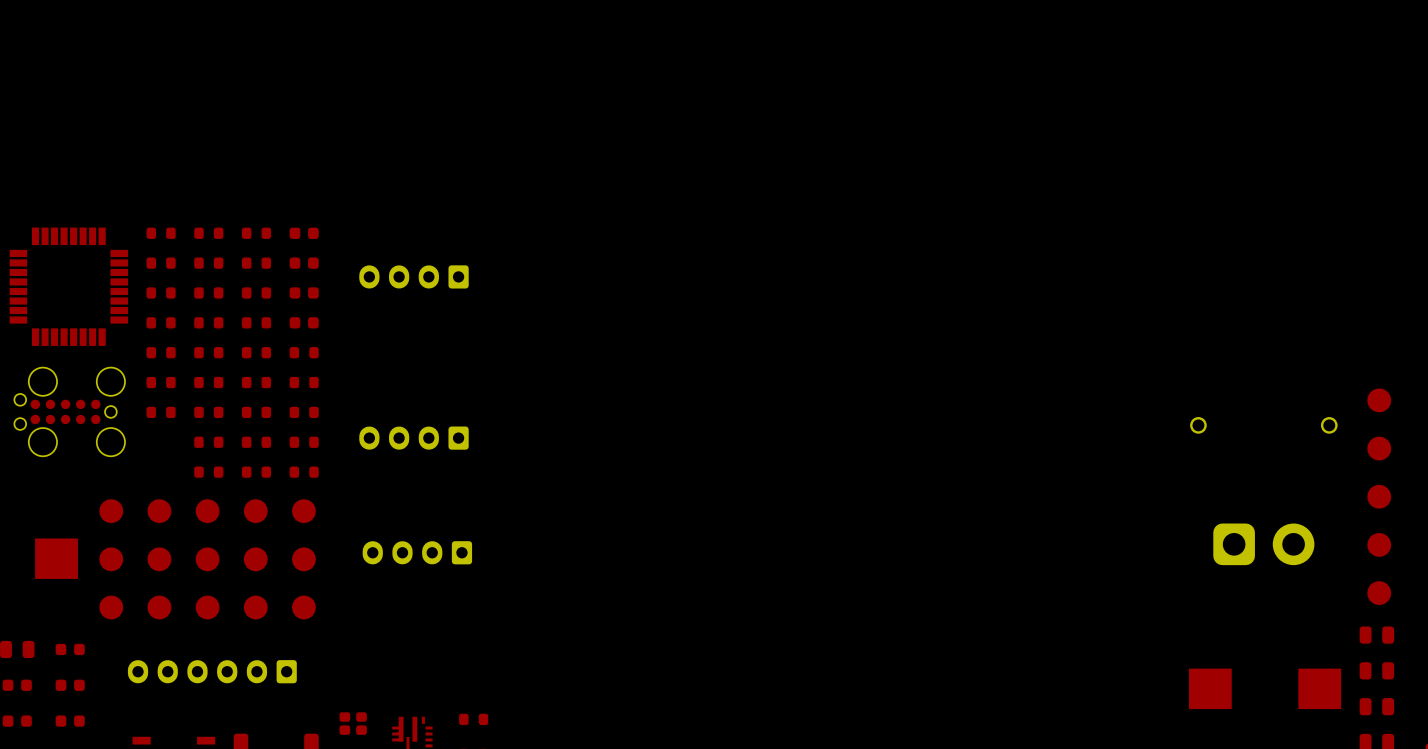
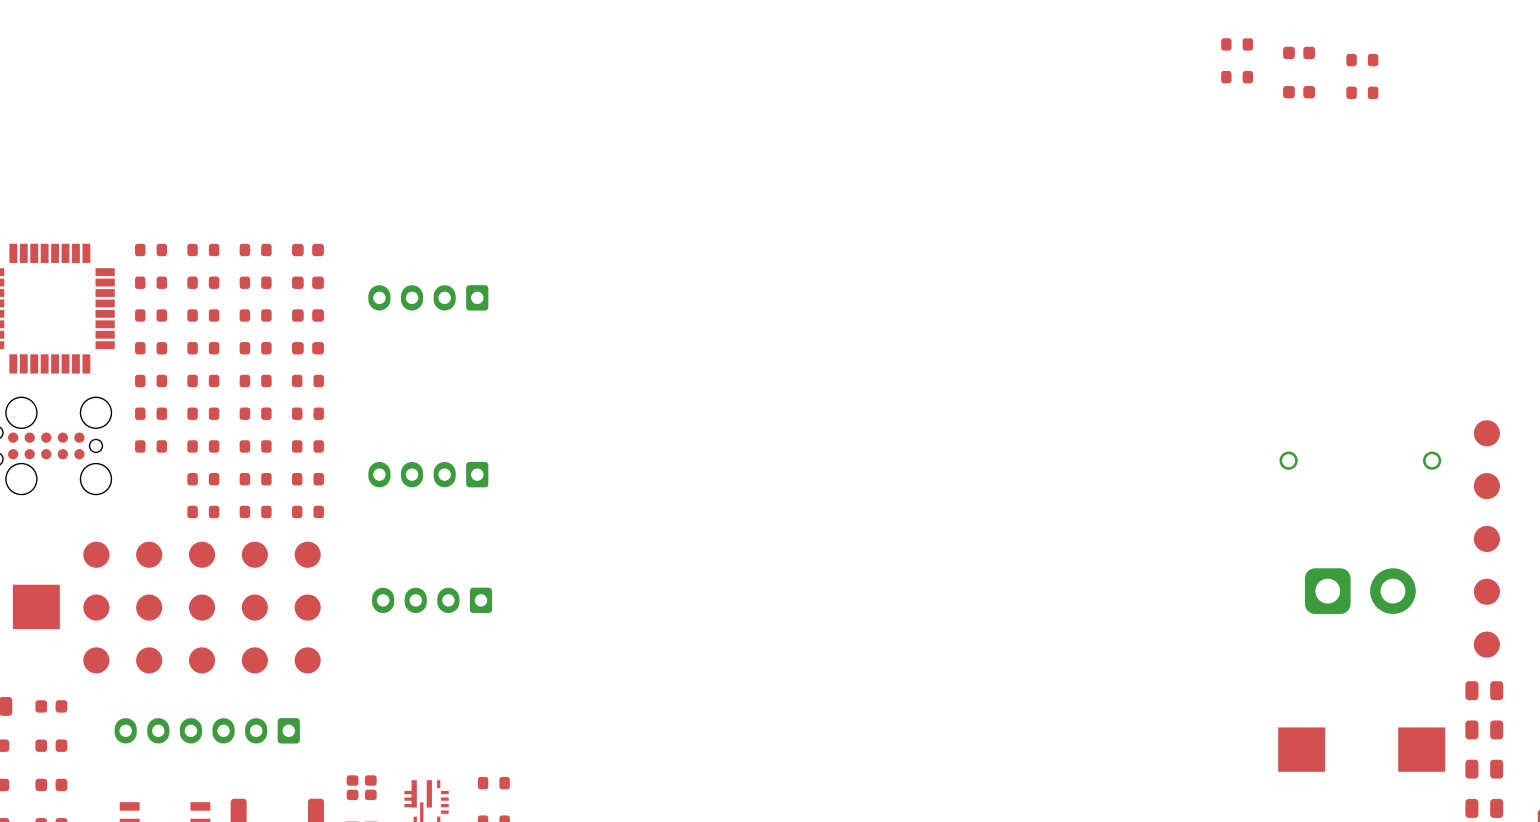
part: none -> (1237, 44)
part: none -> (1299, 52)
part: none -> (1362, 60)
part: none -> (1237, 77)
part: none -> (1299, 92)
part: none -> (1362, 92)

